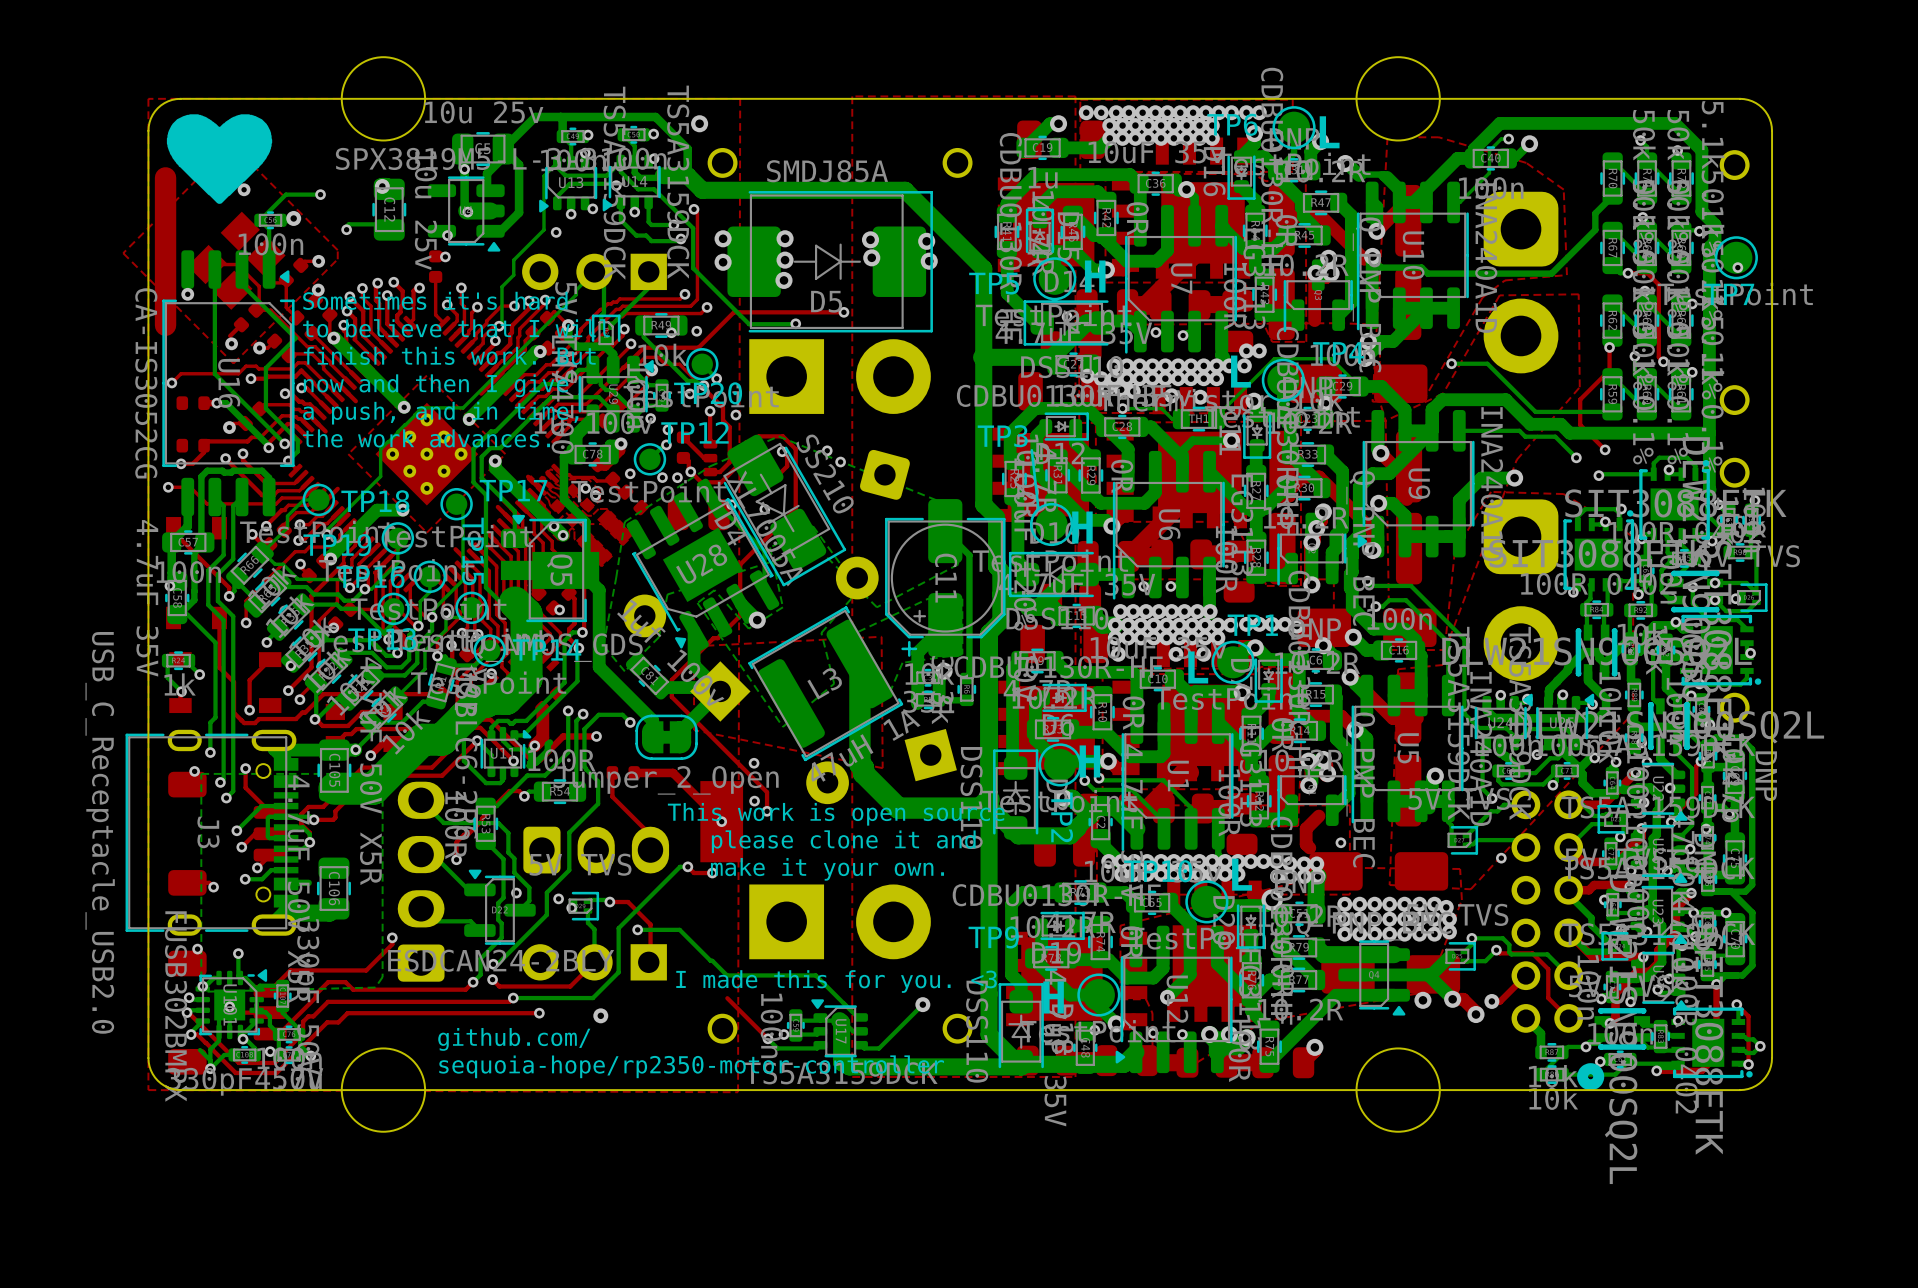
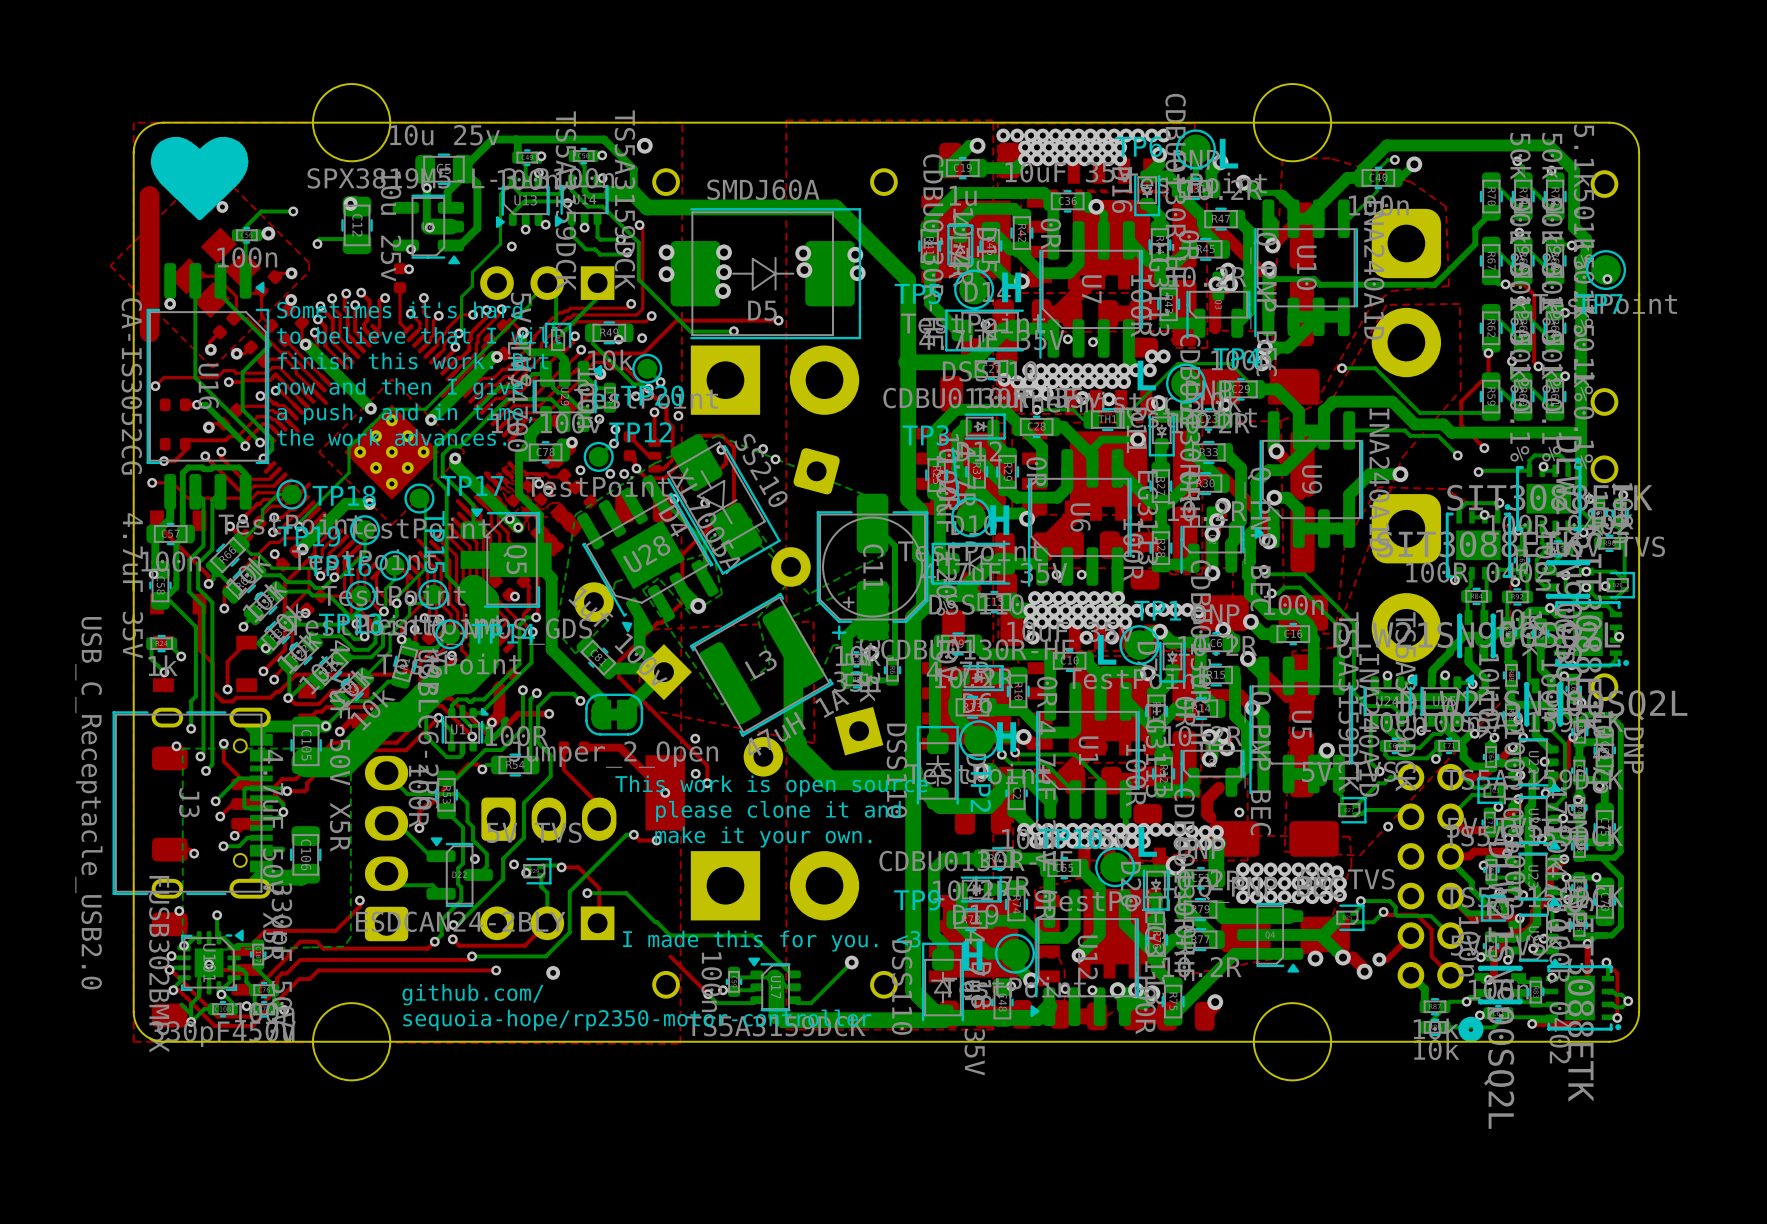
D5 value: SMDJ85A (827, 171) -> SMDJ60A (763, 189)

